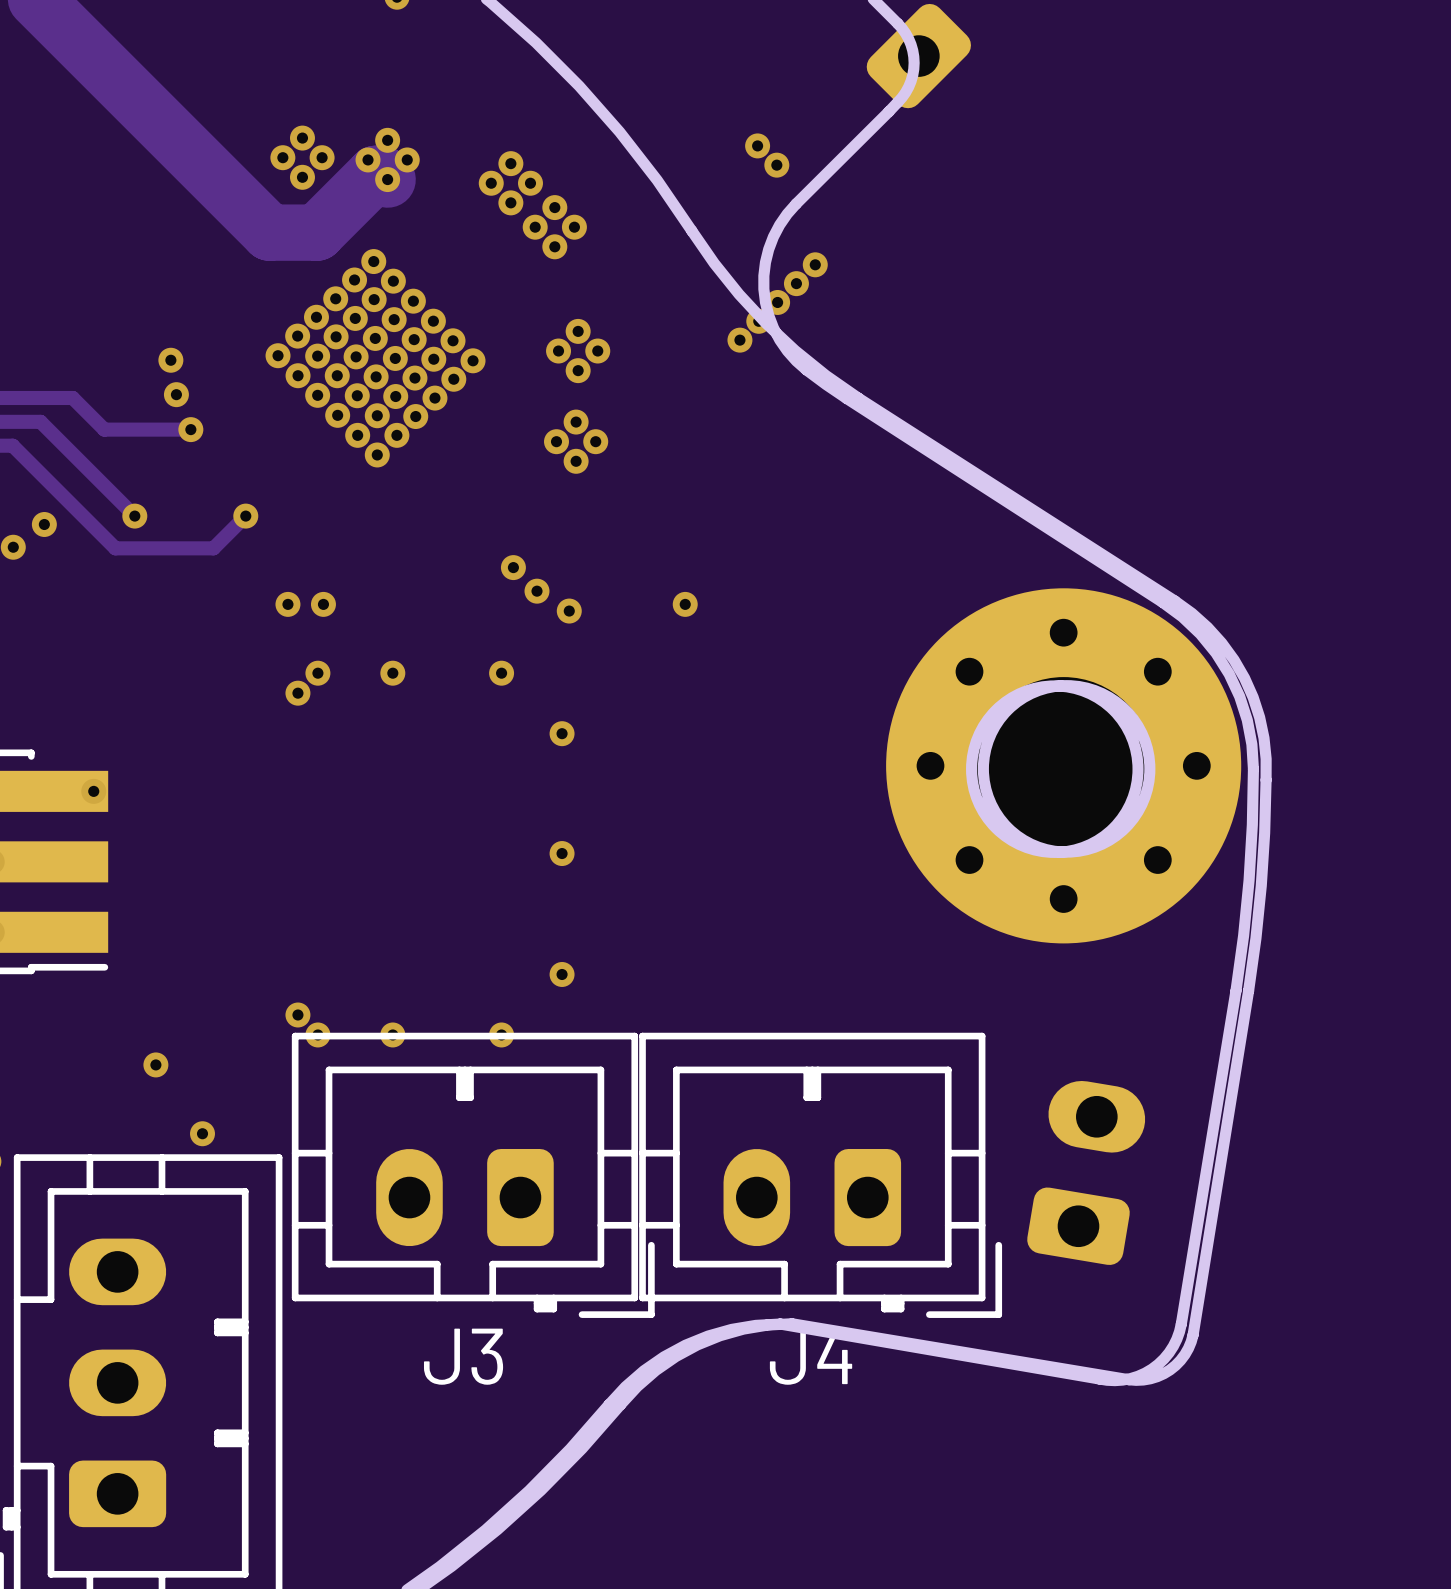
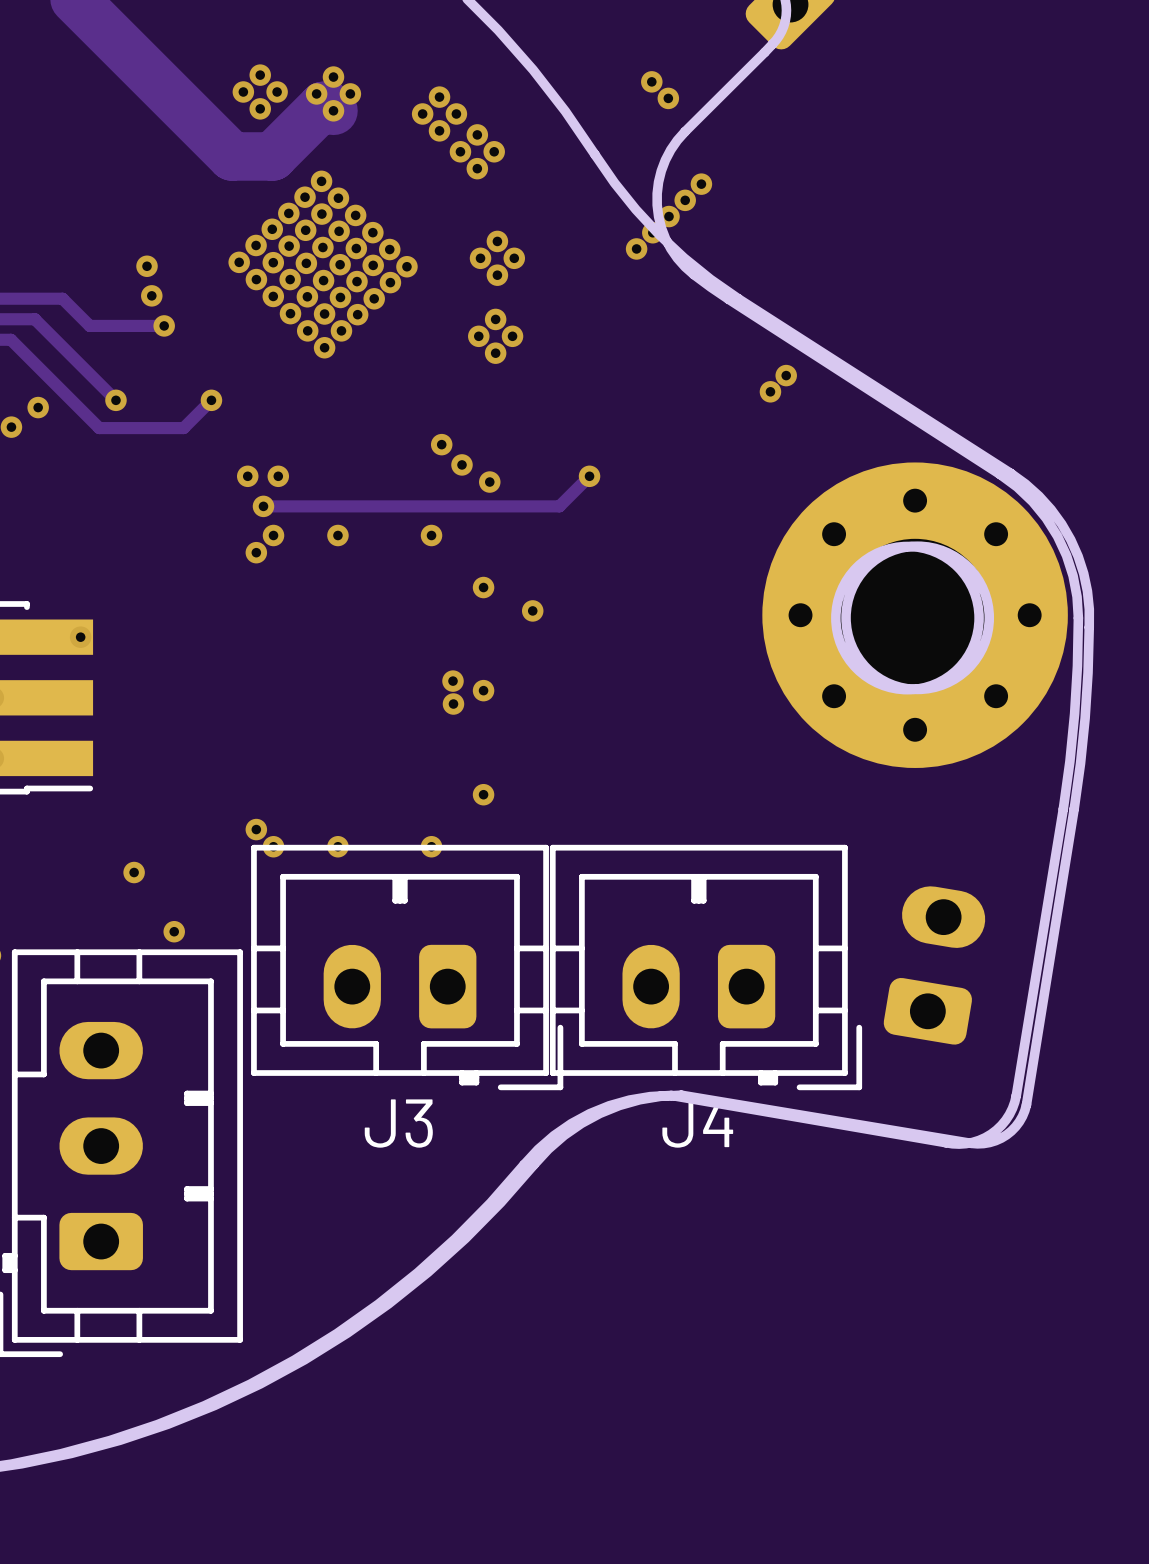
via: none -> (786, 375)
via: none -> (770, 391)
track: none -> (589, 476) (559, 506) (263, 506)
via: none -> (263, 506)
via: none -> (532, 610)
via: none -> (453, 681)
via: none -> (453, 704)

